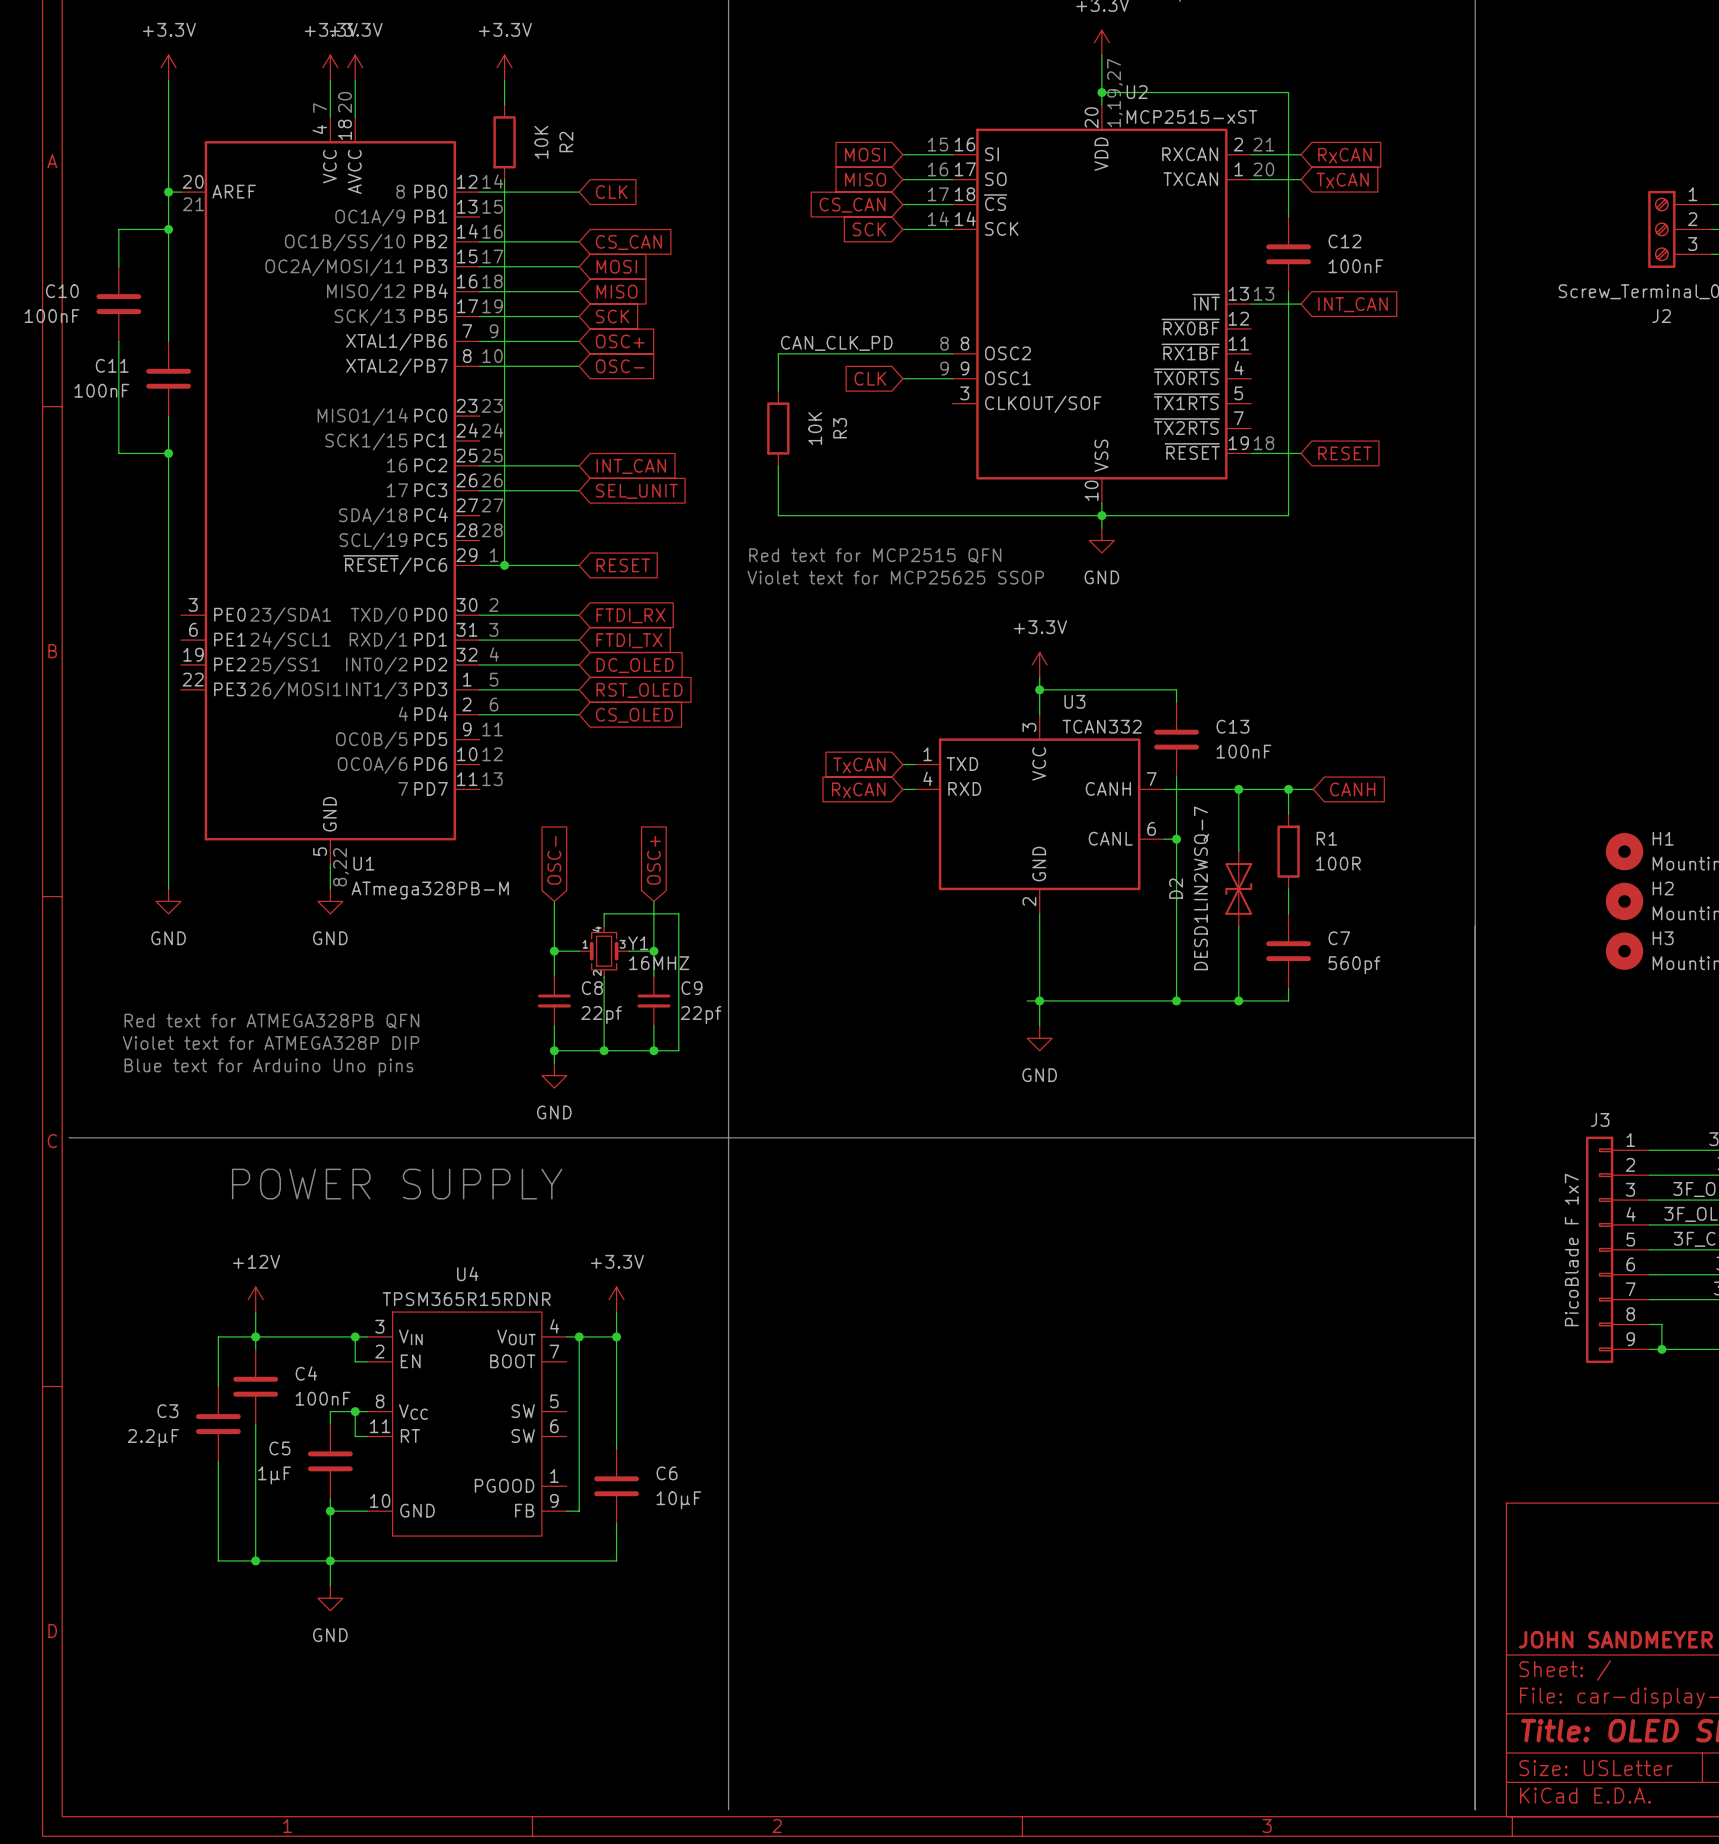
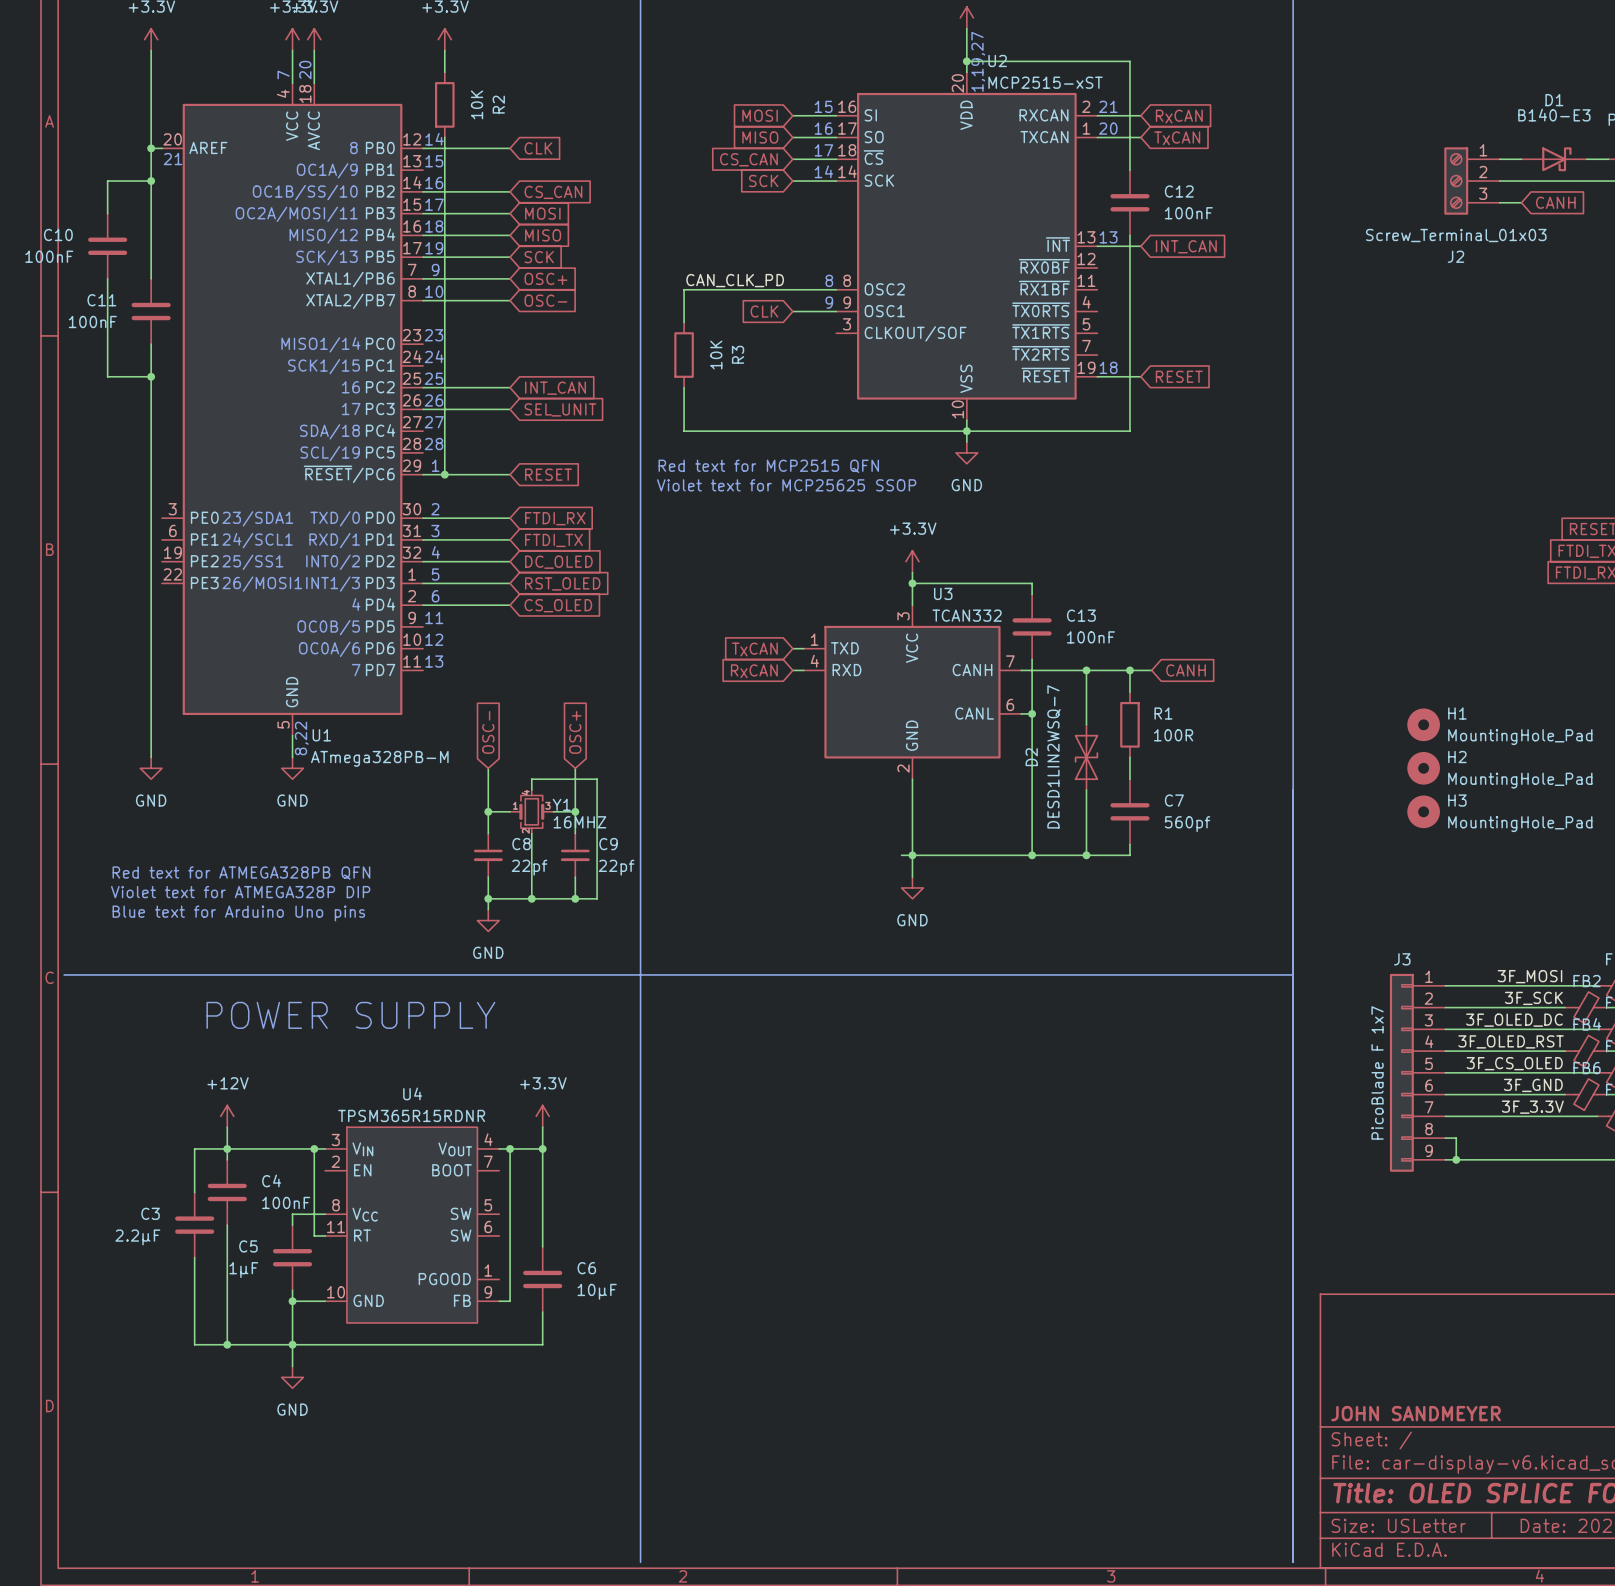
wire: (355, 1361) (367, 1361) -> (314, 1170) (314, 1214)
junction: (355, 1411) -> none

